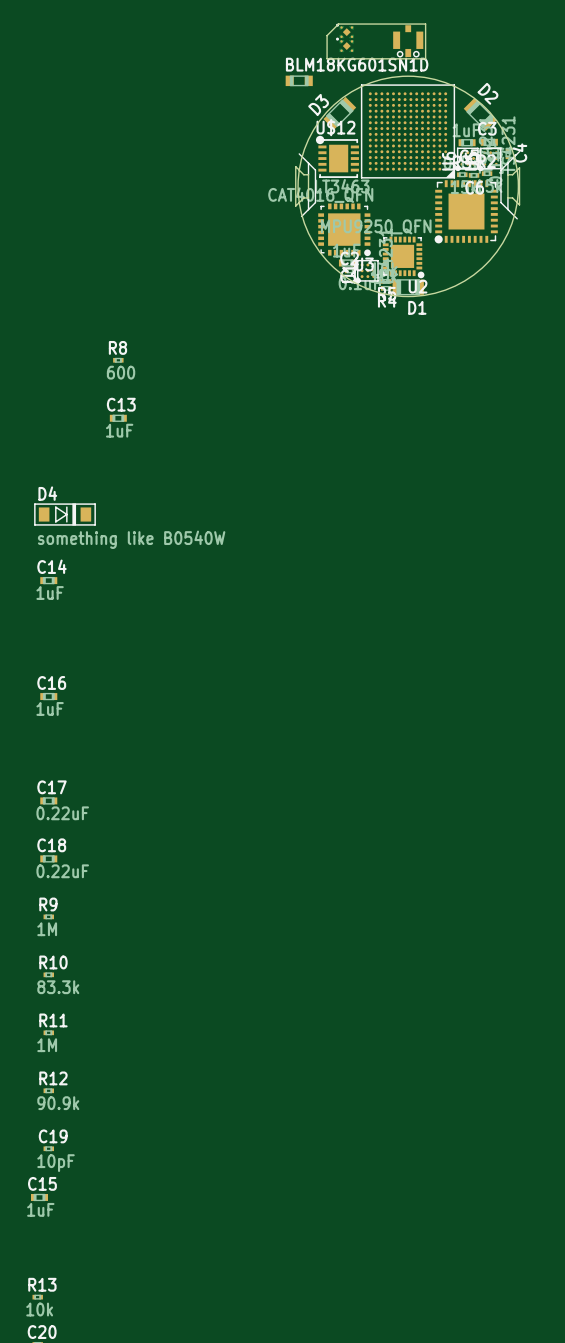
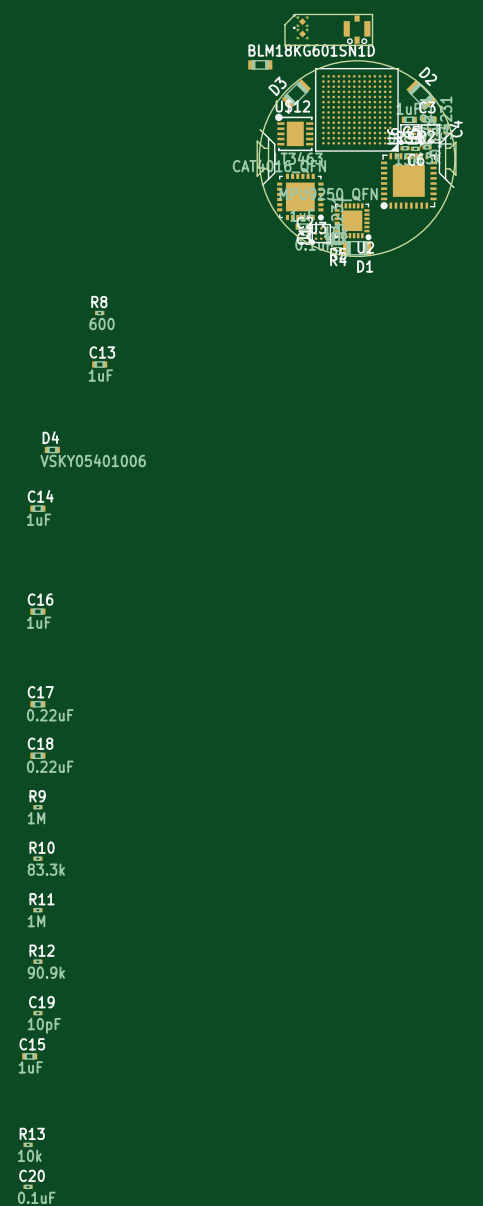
D4 footprint: [34, 503, 96, 526] -> [44, 446, 60, 454]
D4 value: something like B0540W (131, 539) -> VSKY05401006 (93, 460)

